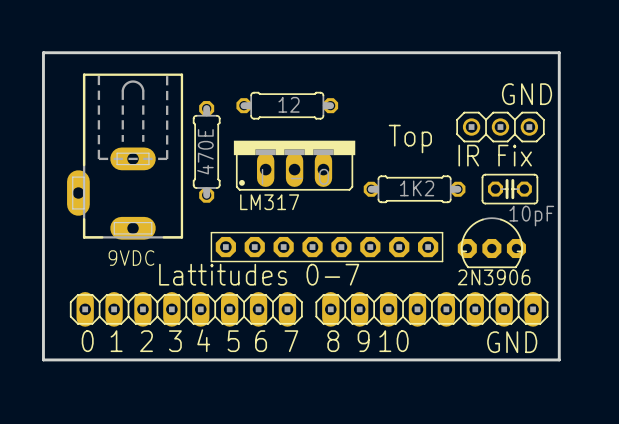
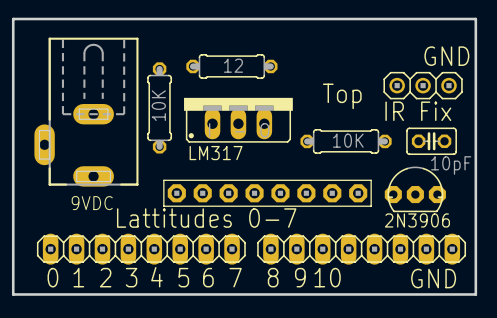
part value: 470E (205, 151) -> 10K (158, 105)
part value: 1K2 (417, 188) -> 10K (348, 140)

